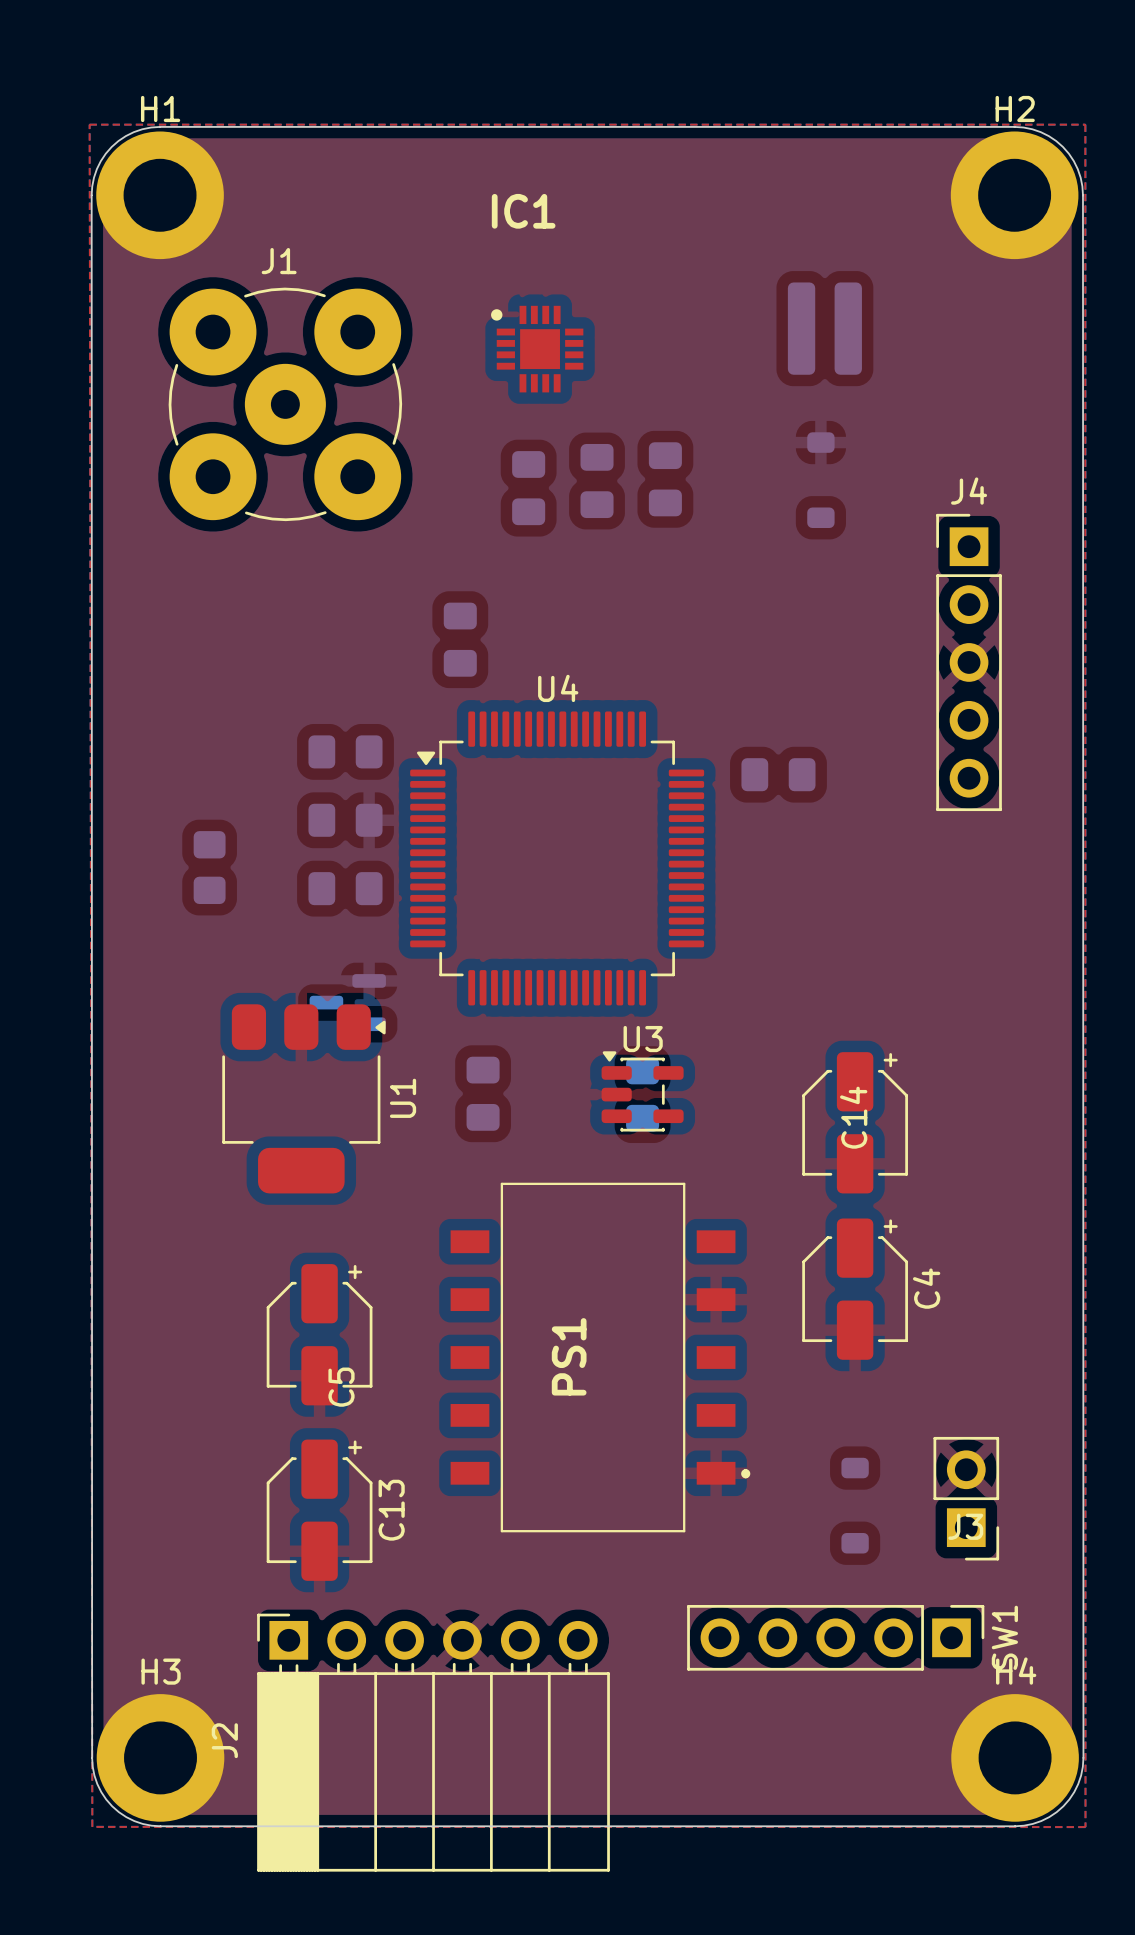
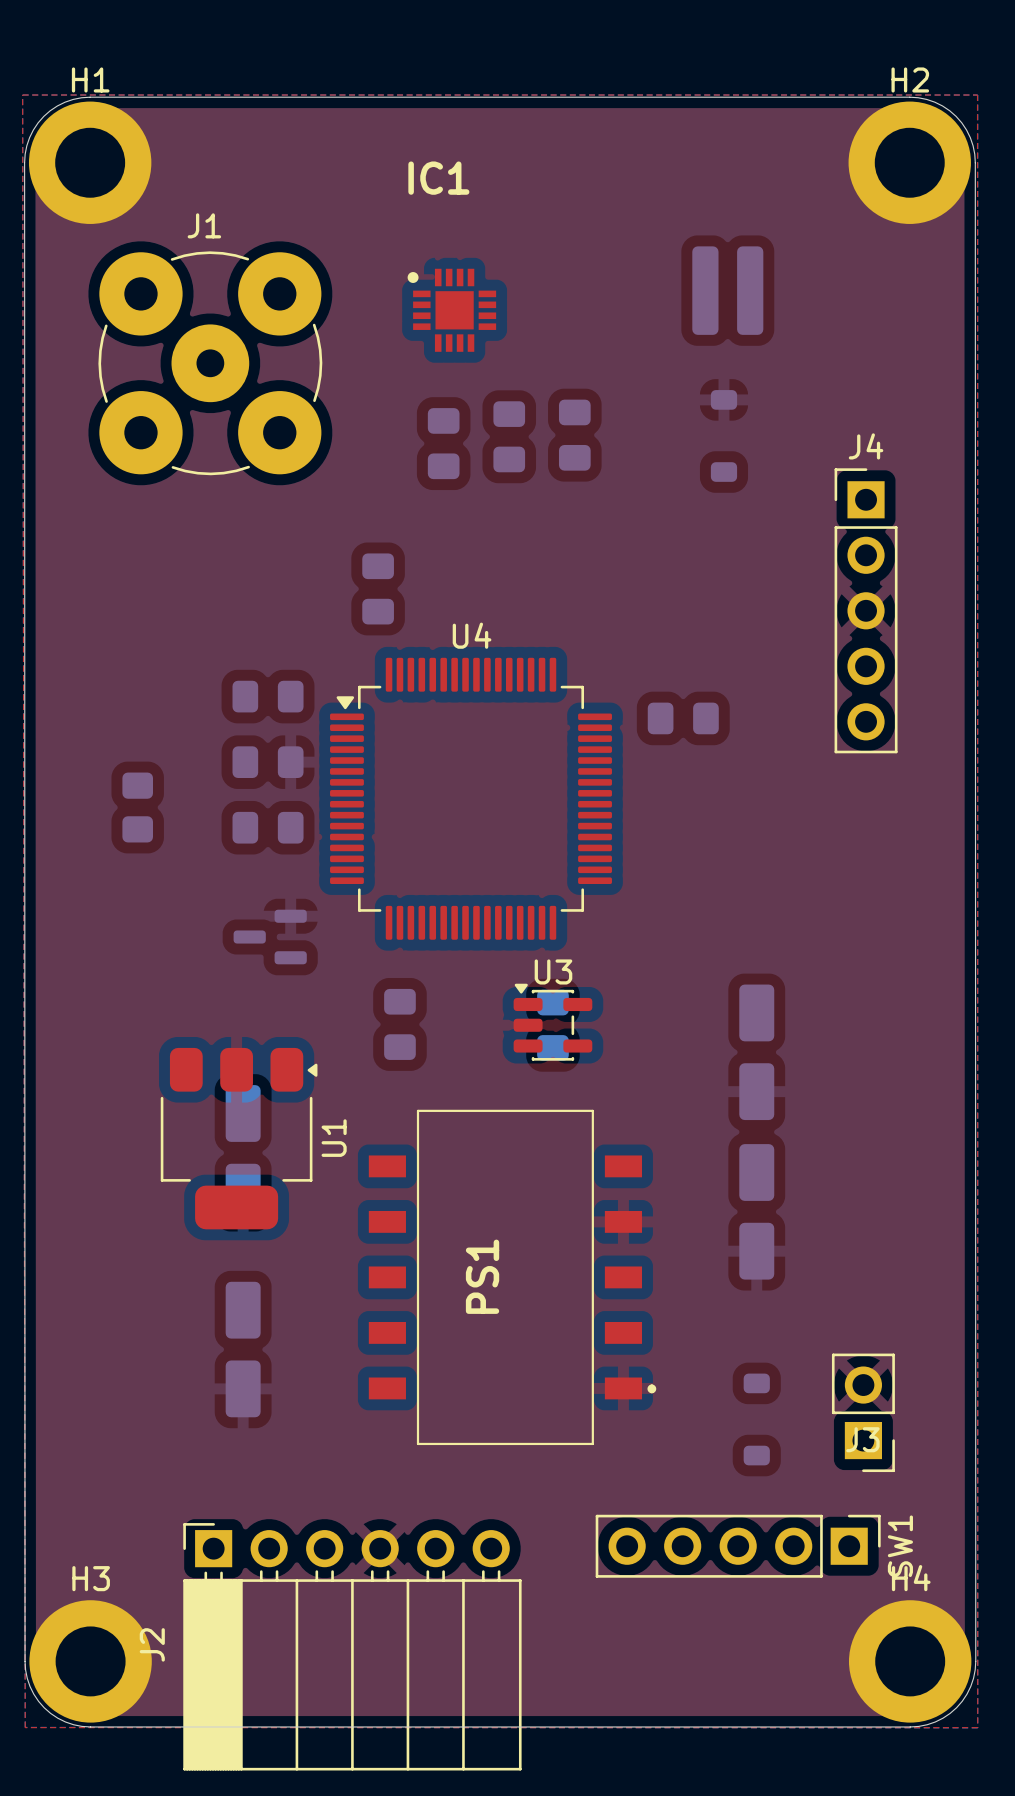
U1 position: (303, 1098) -> (239, 1138)
C14 side: top (855, 1122) -> bottom (756, 1052)
C4 side: top (855, 1289) -> bottom (756, 1211)
C5 side: top (319, 1334) -> bottom (243, 1152)
C13 side: top (319, 1510) -> bottom (243, 1349)

